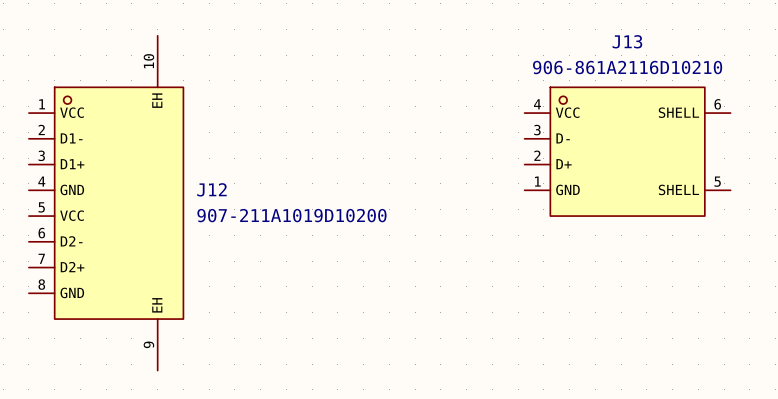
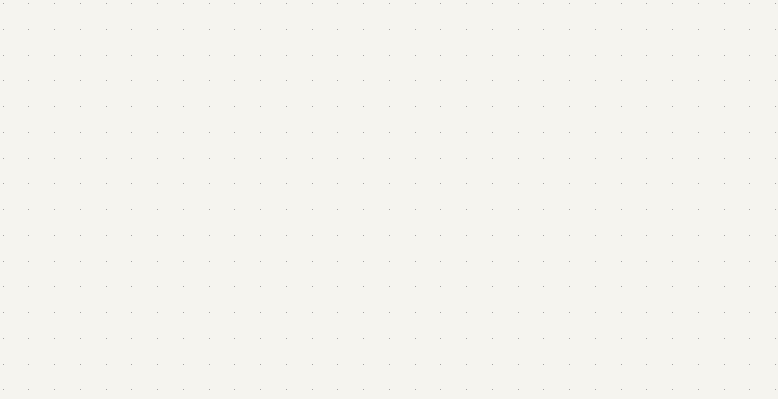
J13: 906-861A2116D10210 (627, 151) -> none
J12: 907-211A1019D10200 (106, 203) -> none

